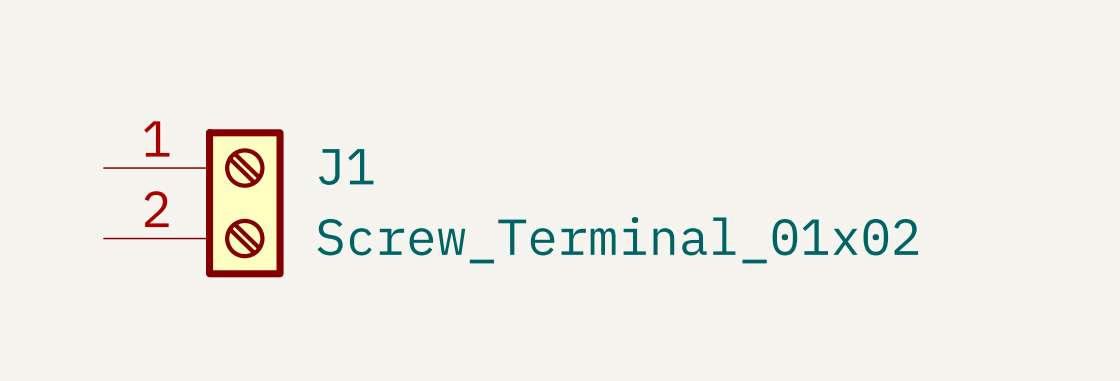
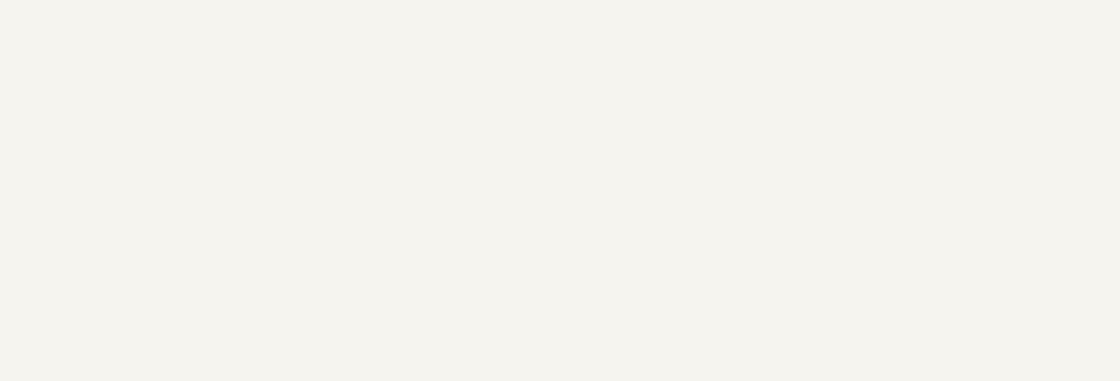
J1: Screw_Terminal_01x02 (193, 203) -> none

